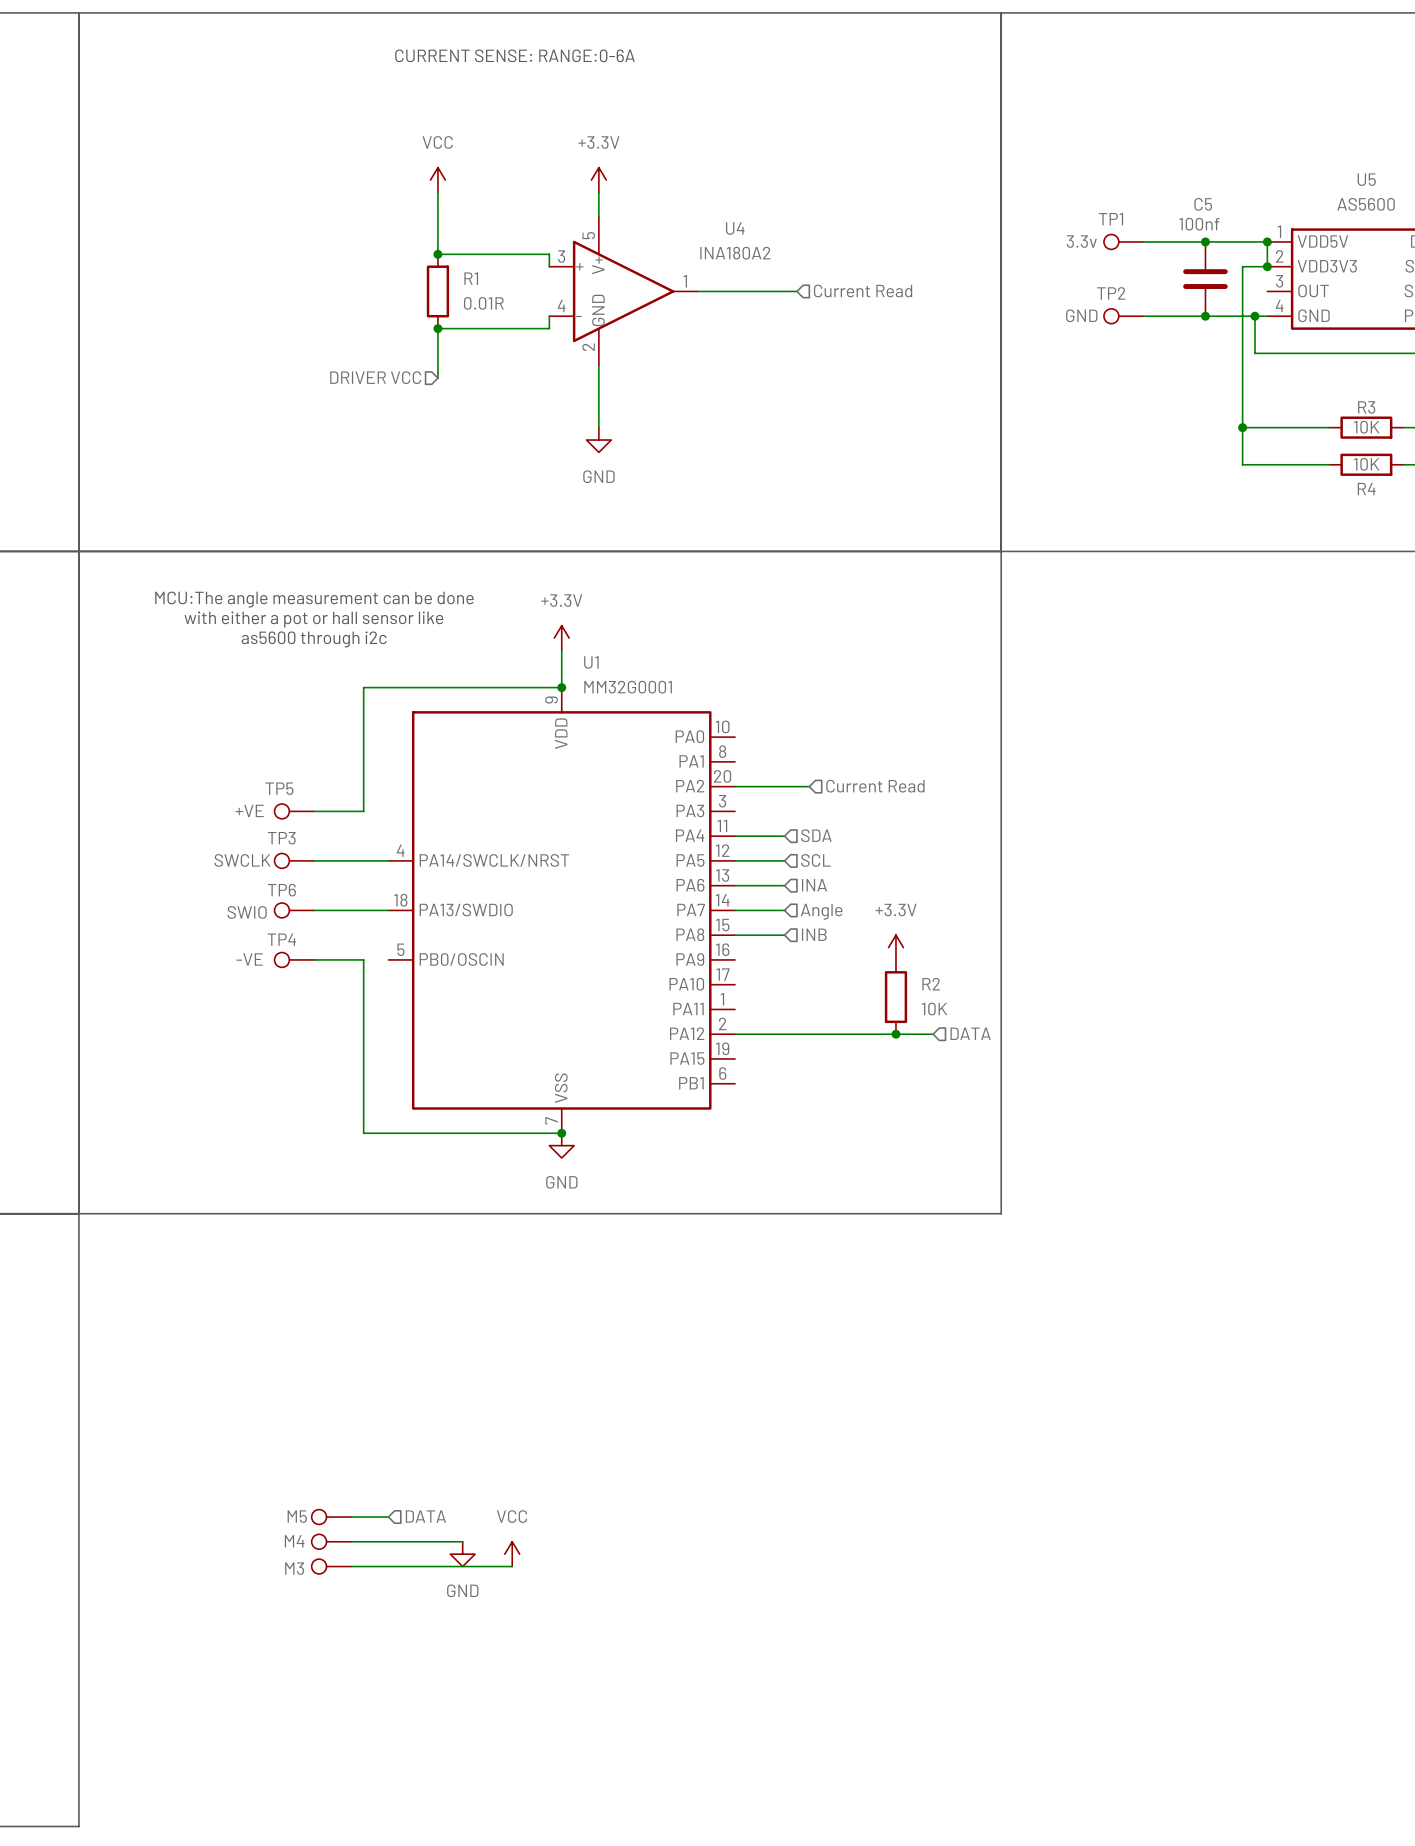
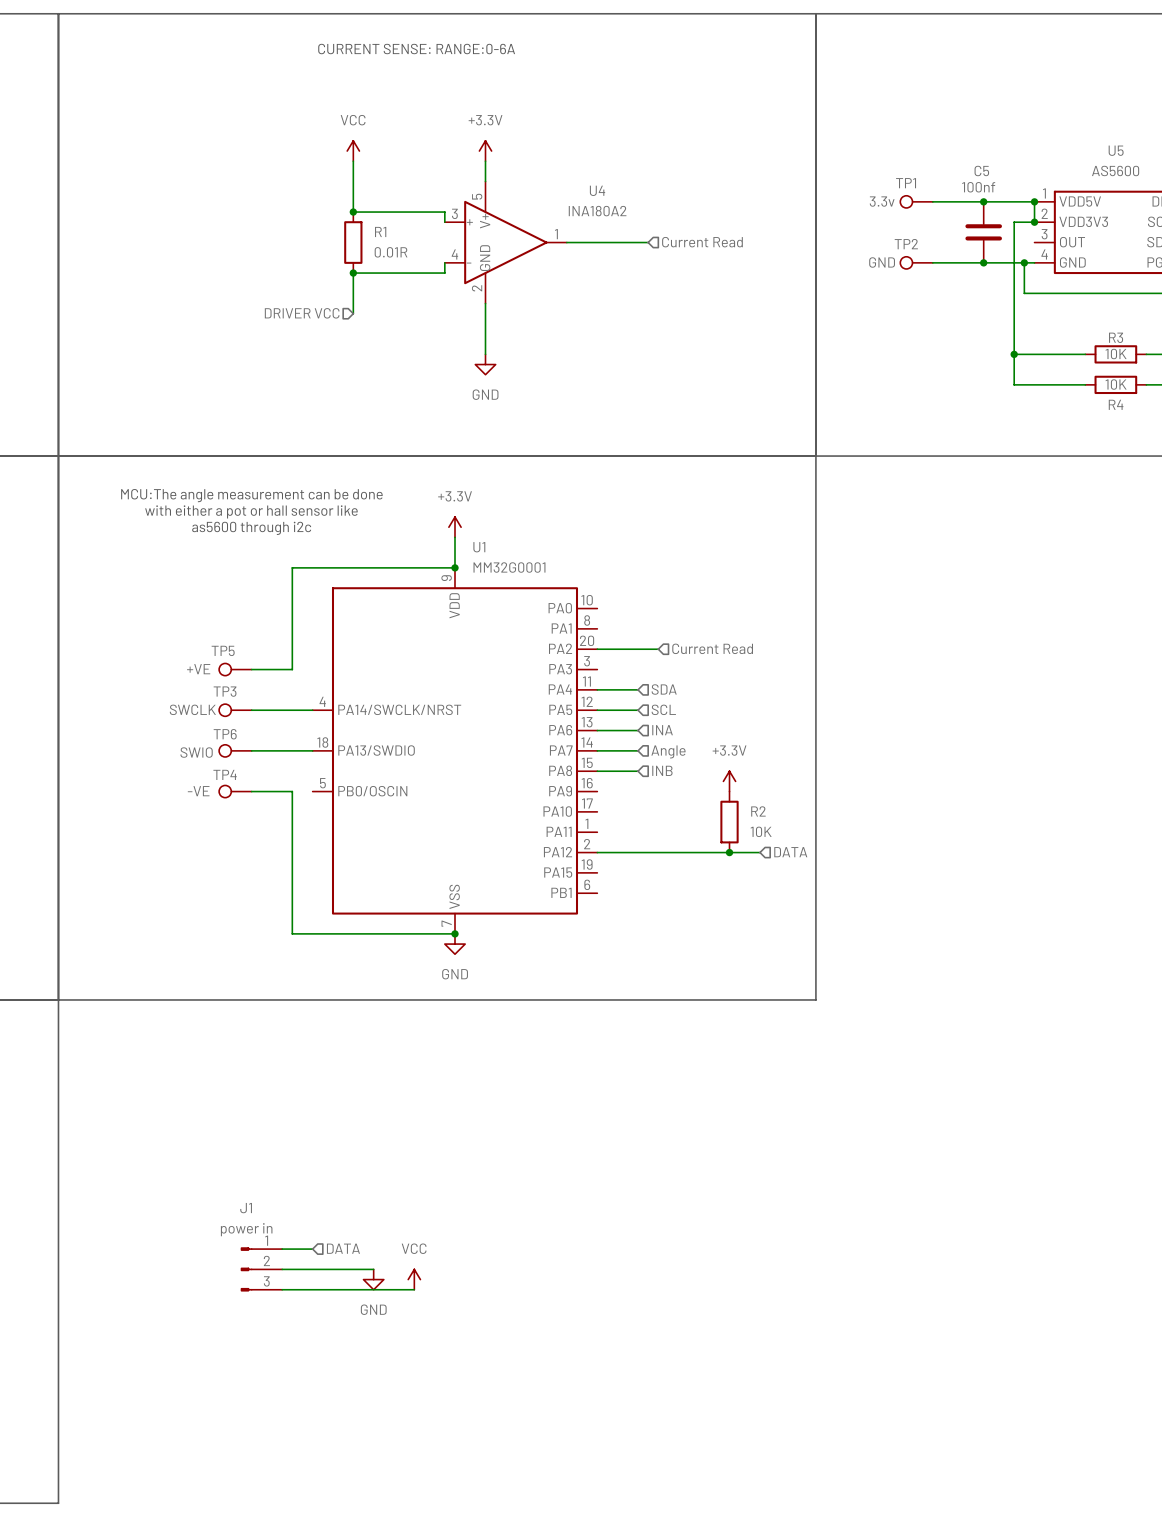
M5: (331, 1517) -> none
J1: none -> power in (261, 1269)
M4: (331, 1541) -> none
M3: (331, 1566) -> none

